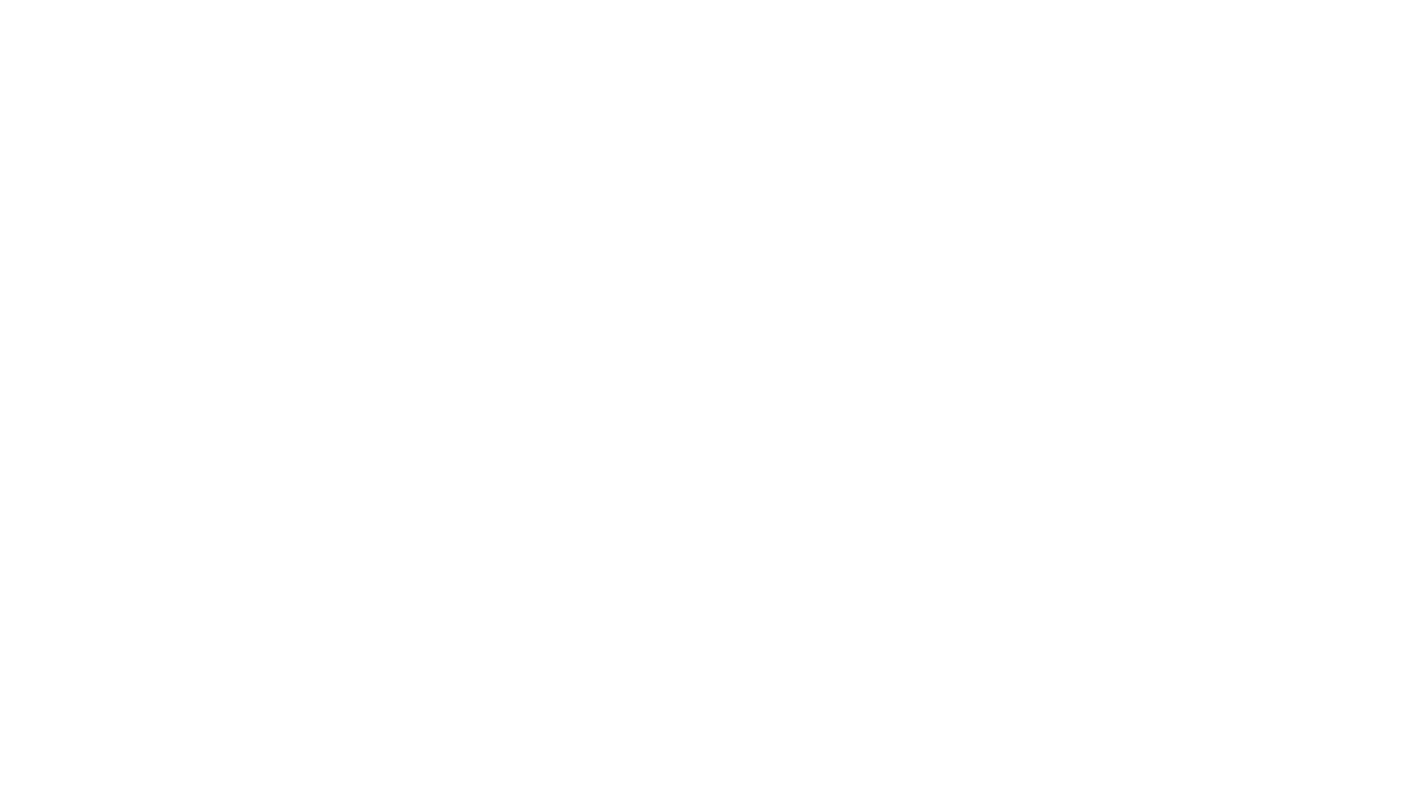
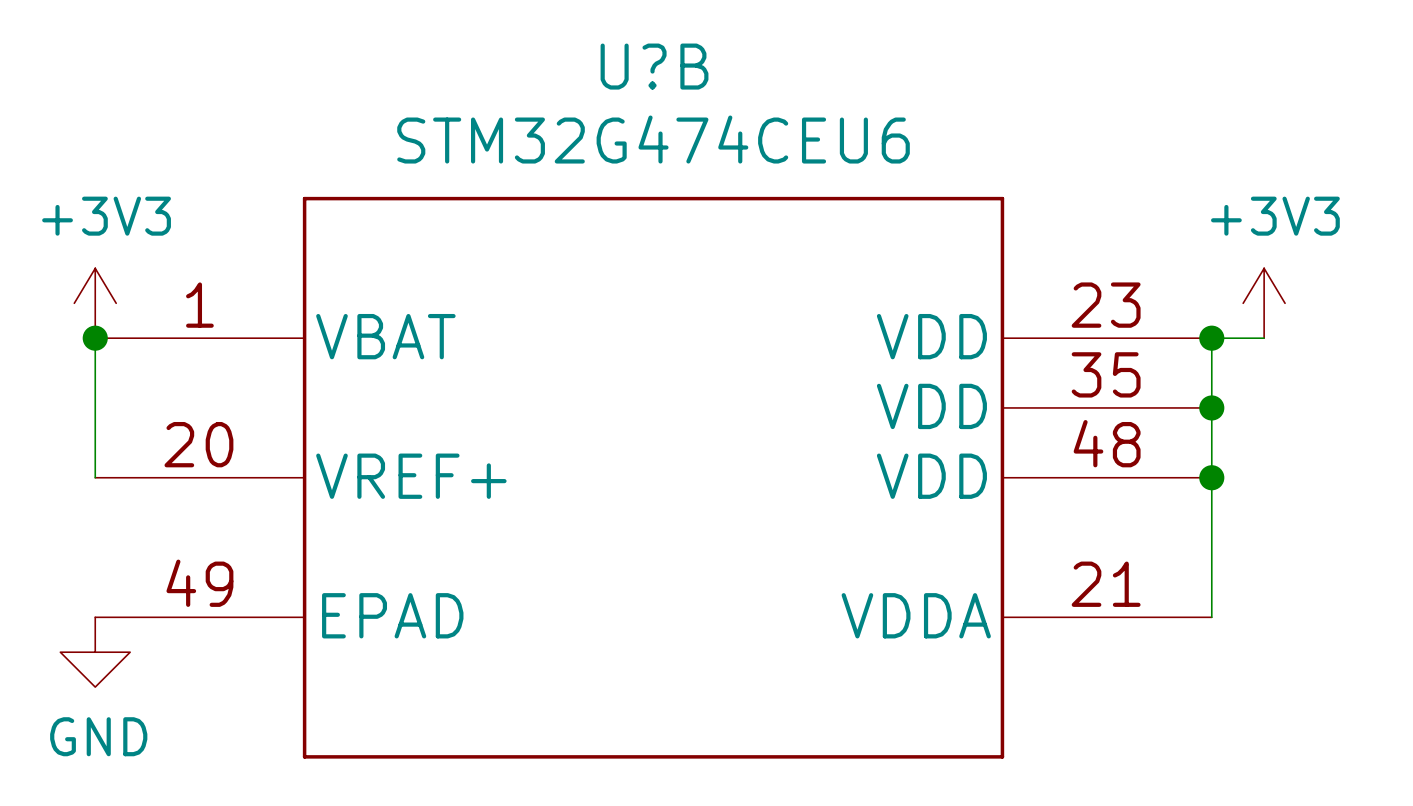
power symbol: none -> +3V3 (95, 303)
power symbol: none -> +3V3 (1264, 303)
wire: none -> (95, 338) (95, 477)
junction: none -> (95, 338)
junction: none -> (1211, 338)
wire: none -> (1264, 338) (1211, 338) (1211, 617)
junction: none -> (1211, 407)
U?B: none -> STM32G474CEU6 (653, 477)
junction: none -> (1211, 477)
power symbol: none -> GND (95, 652)

